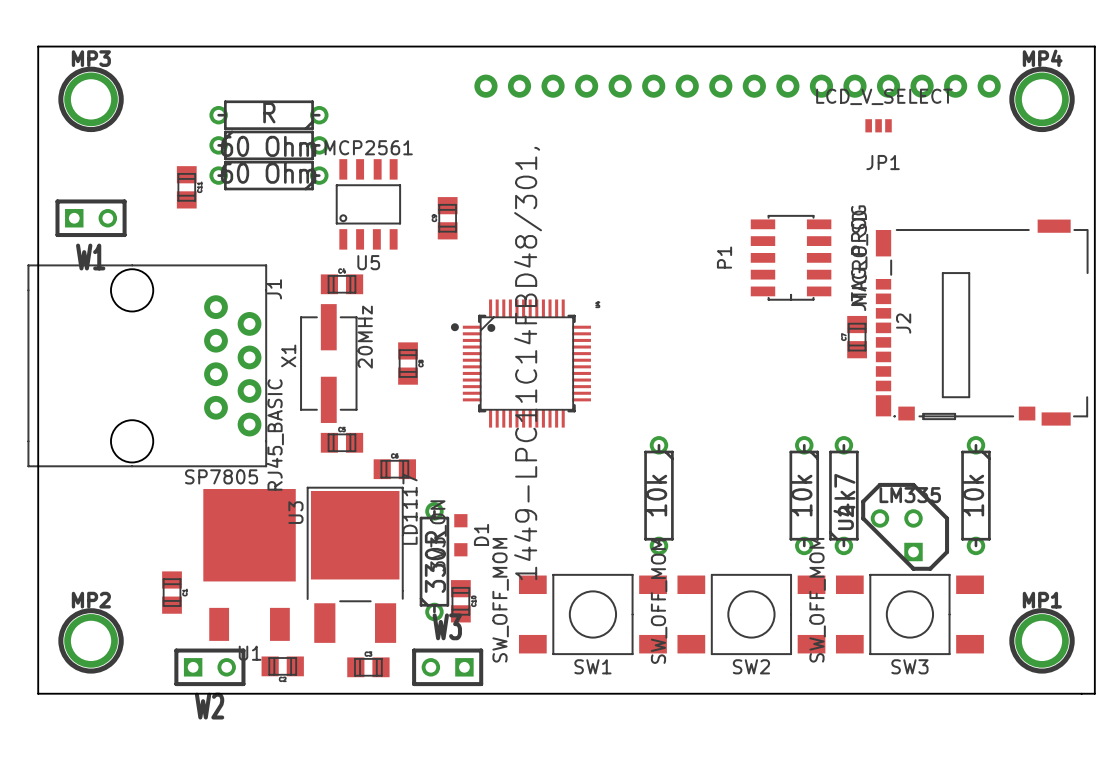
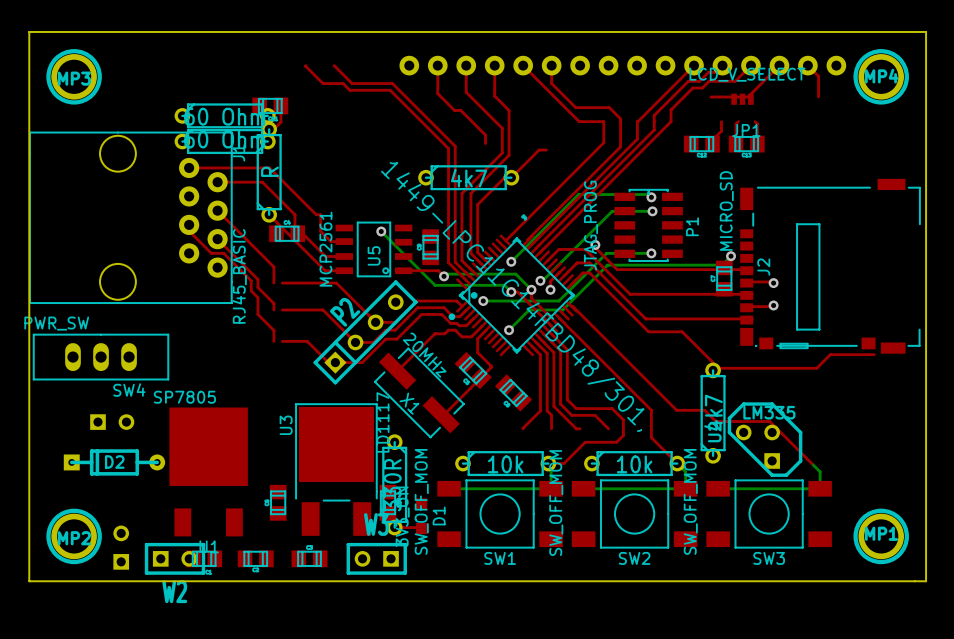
MP3 name position: MP3 (91, 58) -> MP3 (74, 78)
MP4 name position: MP4 (1042, 58) -> MP4 (881, 76)
top track: none -> (305, 65) (322, 83) (343, 83) (349, 90) (390, 90) (448, 148) (448, 262) (466, 280)
top track: none -> (334, 65) (352, 83) (392, 83) (455, 146) (455, 262) (470, 276)
top track: none -> (437, 65) (437, 93) (454, 110) (460, 110) (485, 135) (485, 143)
top track: none -> (466, 65) (466, 92) (502, 128) (502, 153) (461, 193) (461, 260) (474, 272)
top track: none -> (494, 65) (494, 96) (509, 110) (509, 155) (470, 193) (470, 253) (481, 264)
top track: none -> (523, 65) (579, 121) (603, 121) (603, 142) (505, 240)
top track: none -> (551, 65) (551, 83) (575, 107) (609, 107) (620, 118) (620, 146) (527, 240)
top track: none -> (694, 65) (637, 121) (637, 139) (531, 244)
top track: none -> (722, 65) (715, 72) (708, 72) (699, 81) (688, 81) (654, 115) (654, 130) (535, 248)
top track: none -> (750, 65) (735, 81) (709, 81) (702, 88) (692, 88) (671, 109) (671, 121) (540, 252)
top track: none -> (779, 65) (748, 97) (710, 97)
top track: none -> (807, 65) (818, 76) (818, 97)
part rotation: 0° (268, 115) -> 90° clockwise (269, 172)
part position: (268, 115) -> (269, 172)
top track: none -> (280, 105) (280, 122) (273, 129)
top track: none -> (721, 121) (721, 131) (712, 140) (712, 144)
top track: none -> (738, 121) (736, 123) (736, 144)
top track: none -> (755, 121) (757, 123) (757, 144)
part: none -> (701, 144)
part: none -> (746, 144)
top track: none -> (546, 150) (539, 150) (511, 177) (504, 177) (477, 204) (477, 252) (486, 260)
part rotation: 0° (186, 187) -> 90° clockwise (270, 105)
part position: (186, 187) -> (270, 105)
U5 rotation: 0° (368, 204) -> 90° counterclockwise (373, 249)
U5 position: (368, 204) -> (373, 249)
top track: none -> (189, 167) (269, 167) (316, 214) (320, 214) (320, 231) (330, 241) (344, 241)
W1 side: top (91, 218) -> bottom (112, 422)
part position: (447, 218) -> (430, 247)
part: none -> 4k7 (468, 177)
top track: none -> (217, 182) (262, 182) (294, 214) (294, 225) (325, 256) (344, 256)
bottom track: none -> (651, 197) (648, 194) (578, 194) (511, 261)
via: none -> (651, 197)
top track: none -> (217, 210) (273, 266) (273, 283)
bottom track: none -> (652, 211) (612, 211) (542, 280) (540, 280)
via: none -> (652, 211)
P1 rotation: 0° (791, 257) -> 180° (648, 225)
top track: none -> (269, 214) (325, 270) (344, 270)
U5 name position: U5 (368, 262) -> U5 (374, 255)
top track: none -> (189, 224) (189, 231) (211, 253) (223, 253) (251, 280) (251, 290) (257, 297) (257, 314) (273, 330) (273, 341)
bottom track: none -> (381, 231) (435, 285) (504, 285) (511, 292)
via: none -> (381, 231)
top track: none -> (217, 239) (257, 279) (257, 287) (273, 303) (273, 309)
top track: none -> (595, 244) (595, 247) (617, 269) (752, 269)
via: none -> (595, 244)
bottom track: none -> (651, 253) (606, 253) (558, 301) (483, 301)
via: none -> (651, 253)
bottom track: none -> (731, 256) (722, 265) (607, 265) (562, 309) (529, 309) (509, 330)
via: none -> (731, 256)
top track: none -> (547, 260) (558, 249) (585, 249) (630, 294) (752, 294)
via: none -> (511, 261)
top track: none -> (403, 270) (438, 270) (444, 276)
top track: none -> (559, 272) (550, 281) (550, 289)
bottom track: none -> (444, 276) (446, 274) (515, 274) (531, 289)
via: none -> (444, 276)
top track: none -> (563, 276) (577, 262) (589, 262) (645, 318) (752, 318)
via: none -> (540, 280)
top track: none -> (752, 281) (773, 283)
top track: none -> (282, 283) (336, 283) (375, 322) (395, 322) (417, 301) (456, 301) (462, 306)
via: none -> (773, 283)
top track: none -> (571, 284) (582, 272) (589, 272) (648, 331) (682, 331) (718, 368) (816, 368) (830, 354) (874, 354)
top track: none -> (531, 289) (531, 298) (555, 322)
via: none -> (531, 289)
via: none -> (550, 289)
top track: none -> (511, 292) (517, 292) (551, 326)
via: none -> (511, 292)
X1 rotation: 0° (328, 363) -> 45° counterclockwise (419, 392)
X1 position: (328, 363) -> (419, 392)
part rotation: 0° (408, 363) -> 135° clockwise (513, 392)
part position: (408, 363) -> (513, 392)
part rotation: 0° (520, 363) -> 45° counterclockwise (513, 295)
part position: (520, 363) -> (513, 295)
via: none -> (483, 301)
J1 position: (147, 365) -> (130, 217)
top track: none -> (773, 305) (752, 306)
via: none -> (773, 305)
top track: none -> (571, 306) (676, 410) (704, 410) (715, 421) (769, 421) (811, 463)
top track: none -> (282, 309) (322, 309) (355, 342) (373, 342) (385, 330) (395, 330) (417, 307) (444, 307) (453, 316) (459, 316) (466, 310)
top track: none -> (474, 318) (466, 325) (459, 325) (456, 323) (450, 323) (441, 314) (421, 314) (396, 339) (385, 339) (362, 362) (328, 362) (307, 341) (282, 341)
top track: none -> (559, 318) (651, 410) (651, 437) (677, 463)
top track: none -> (482, 326) (471, 336) (461, 336) (455, 330) (448, 330) (444, 333) (434, 333) (397, 371)
via: none -> (509, 330)
top track: none -> (547, 330) (567, 349) (567, 399) (576, 408) (612, 408) (623, 419) (623, 435) (616, 442) (585, 442) (563, 463) (548, 463)
top track: none -> (486, 330) (477, 338) (477, 352) (491, 367) (444, 414) (441, 414)
P2: none -> (365, 332)
top track: none -> (543, 334) (560, 351) (560, 404) (571, 415) (595, 415) (608, 428)
top track: none -> (539, 338) (553, 352) (553, 406) (576, 428) (580, 428)
top track: none -> (535, 342) (547, 353) (547, 410) (551, 415) (551, 428)
top track: none -> (531, 346) (540, 354) (540, 410) (523, 428)
SW4: none -> PWR_SW (101, 357)
part rotation: 0° (341, 442) -> 135° counterclockwise (473, 370)
part position: (341, 442) -> (473, 370)
part rotation: 0° (394, 469) -> 90° counterclockwise (278, 502)
part position: (394, 469) -> (278, 502)
part: 10k (658, 495) -> none
part: 10k (804, 495) -> none
part: 10k (975, 495) -> none
D1 position: (460, 535) -> (421, 516)
D2: none -> (114, 462)
part: none -> 10k (505, 463)
bottom track: none -> (548, 463) (551, 466) (551, 488) (449, 488)
part: none -> 10k (634, 463)
bottom track: none -> (677, 463) (685, 471) (685, 488) (583, 488)
bottom track: none -> (811, 463) (820, 471) (820, 488) (718, 488)
part rotation: 0° (434, 561) -> 180° (394, 484)
U3 position: (355, 564) -> (336, 469)
part rotation: 0° (172, 592) -> 90° clockwise (204, 558)
part position: (172, 592) -> (204, 558)
MP2 name position: MP2 (91, 600) -> MP2 (74, 538)
MP1 name position: MP1 (1042, 600) -> MP1 (881, 533)
top track: none -> (394, 527) (421, 528)
part: none -> (121, 547)
part position: (282, 666) -> (255, 558)

